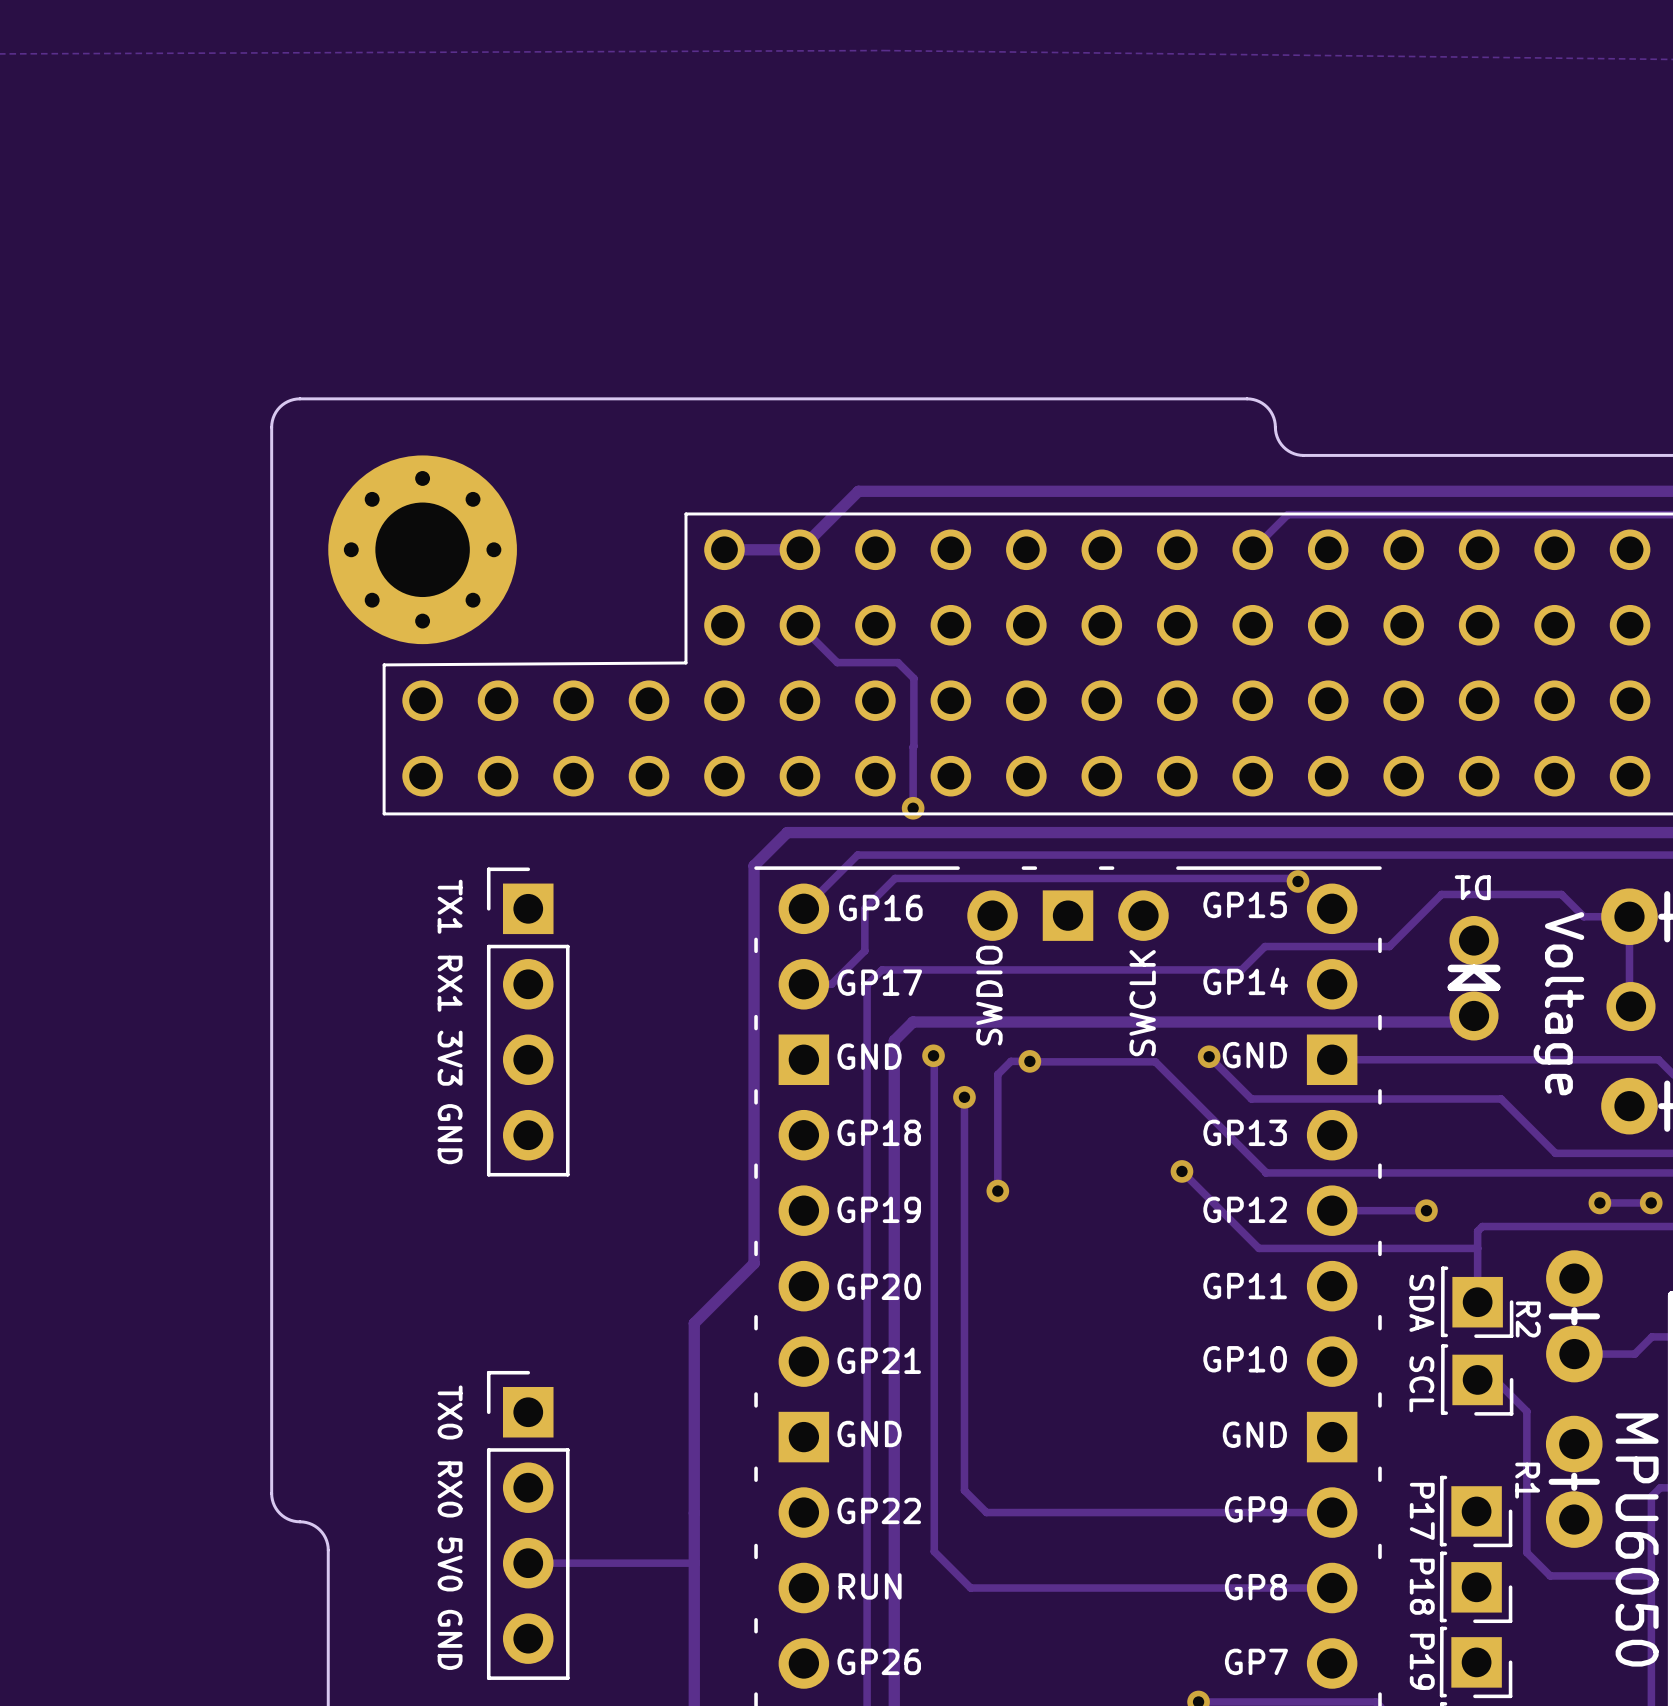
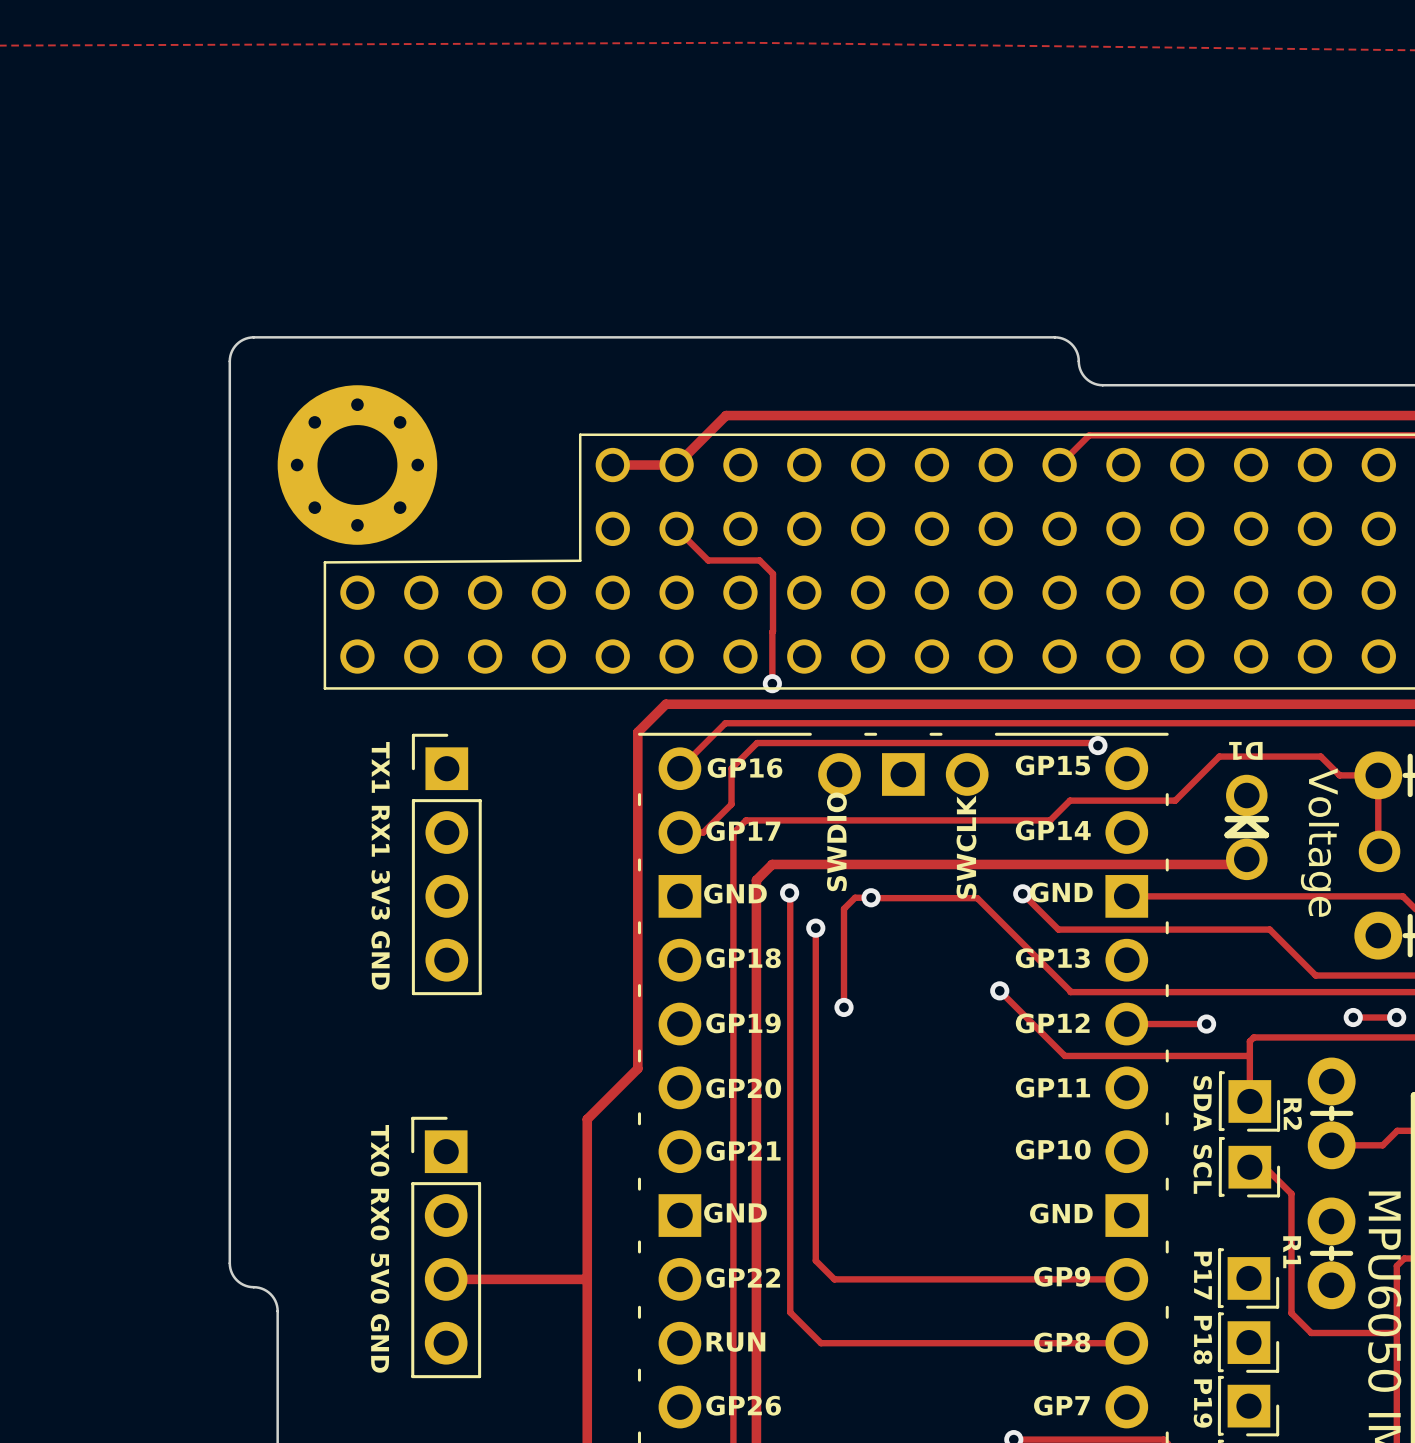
text: none -> TX0 (380, 1150)
text: TX0 (450, 1412) -> RX0 (380, 1214)
text: RX0 (450, 1489) -> 5V0 (380, 1278)
part position: (528, 1525) -> (446, 1247)
track: (528, 1563) (694, 1563) -> (446, 1279) (586, 1279)
text: 5V0 (450, 1564) -> GND (380, 1343)
text: GND (450, 1639) -> none

